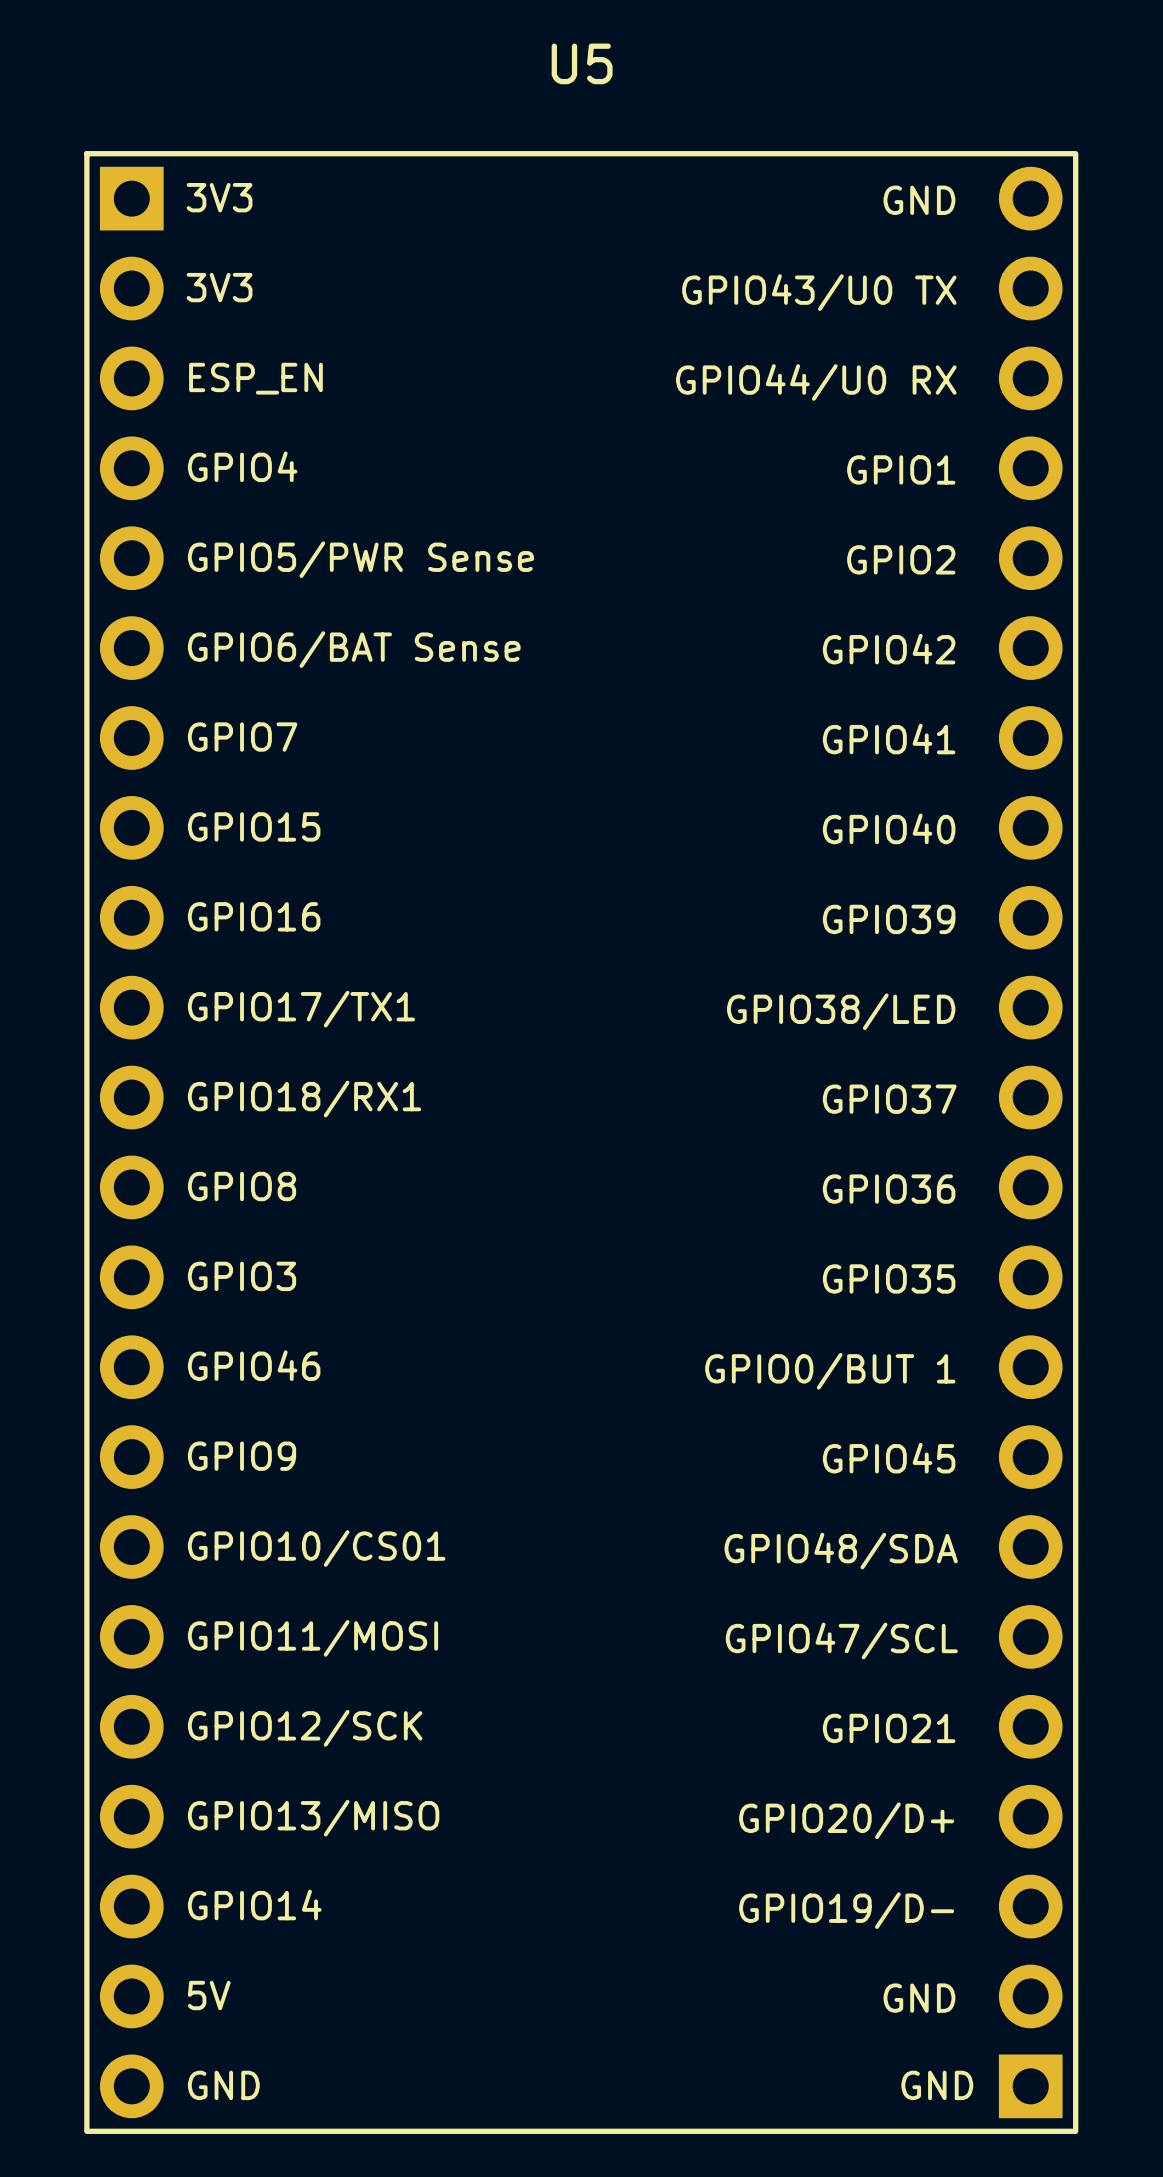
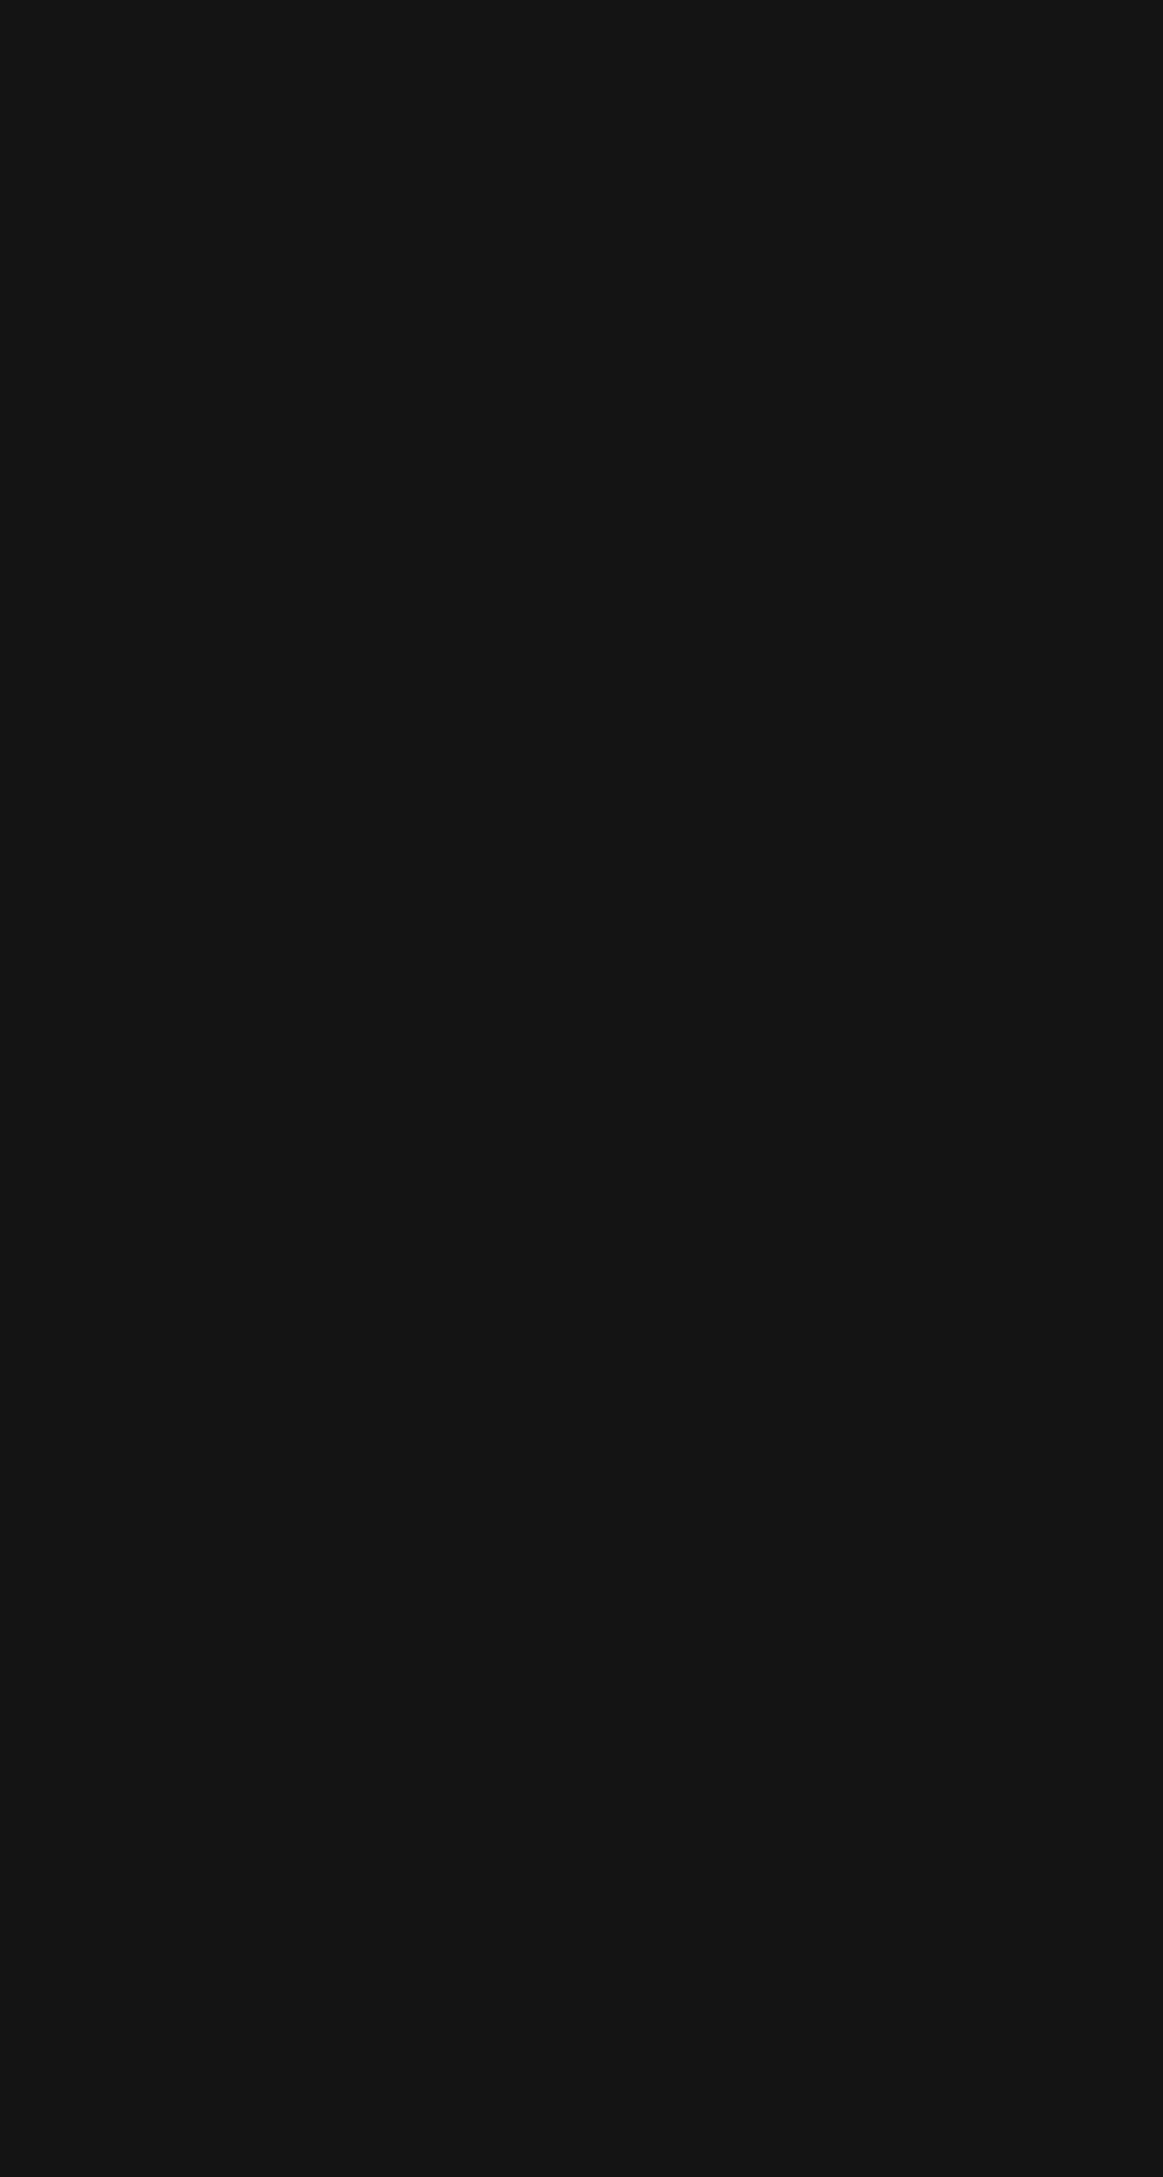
U5: (581, 1142) -> none

